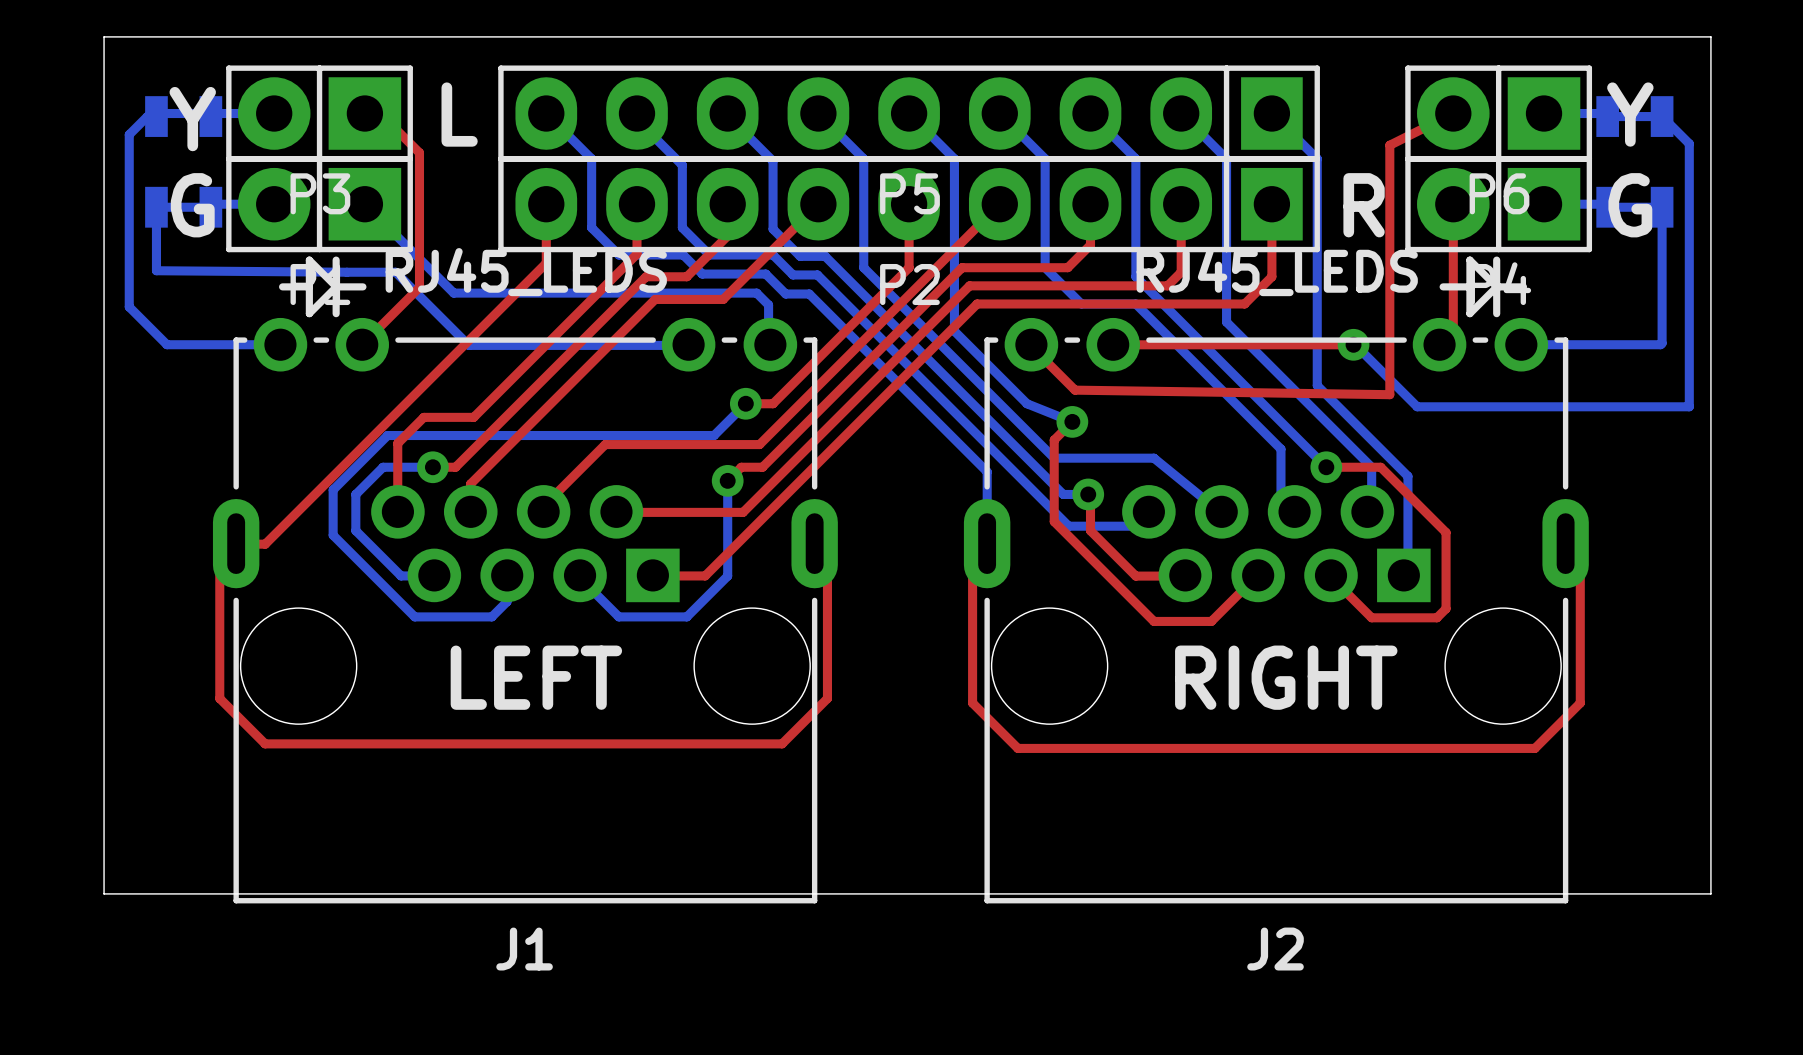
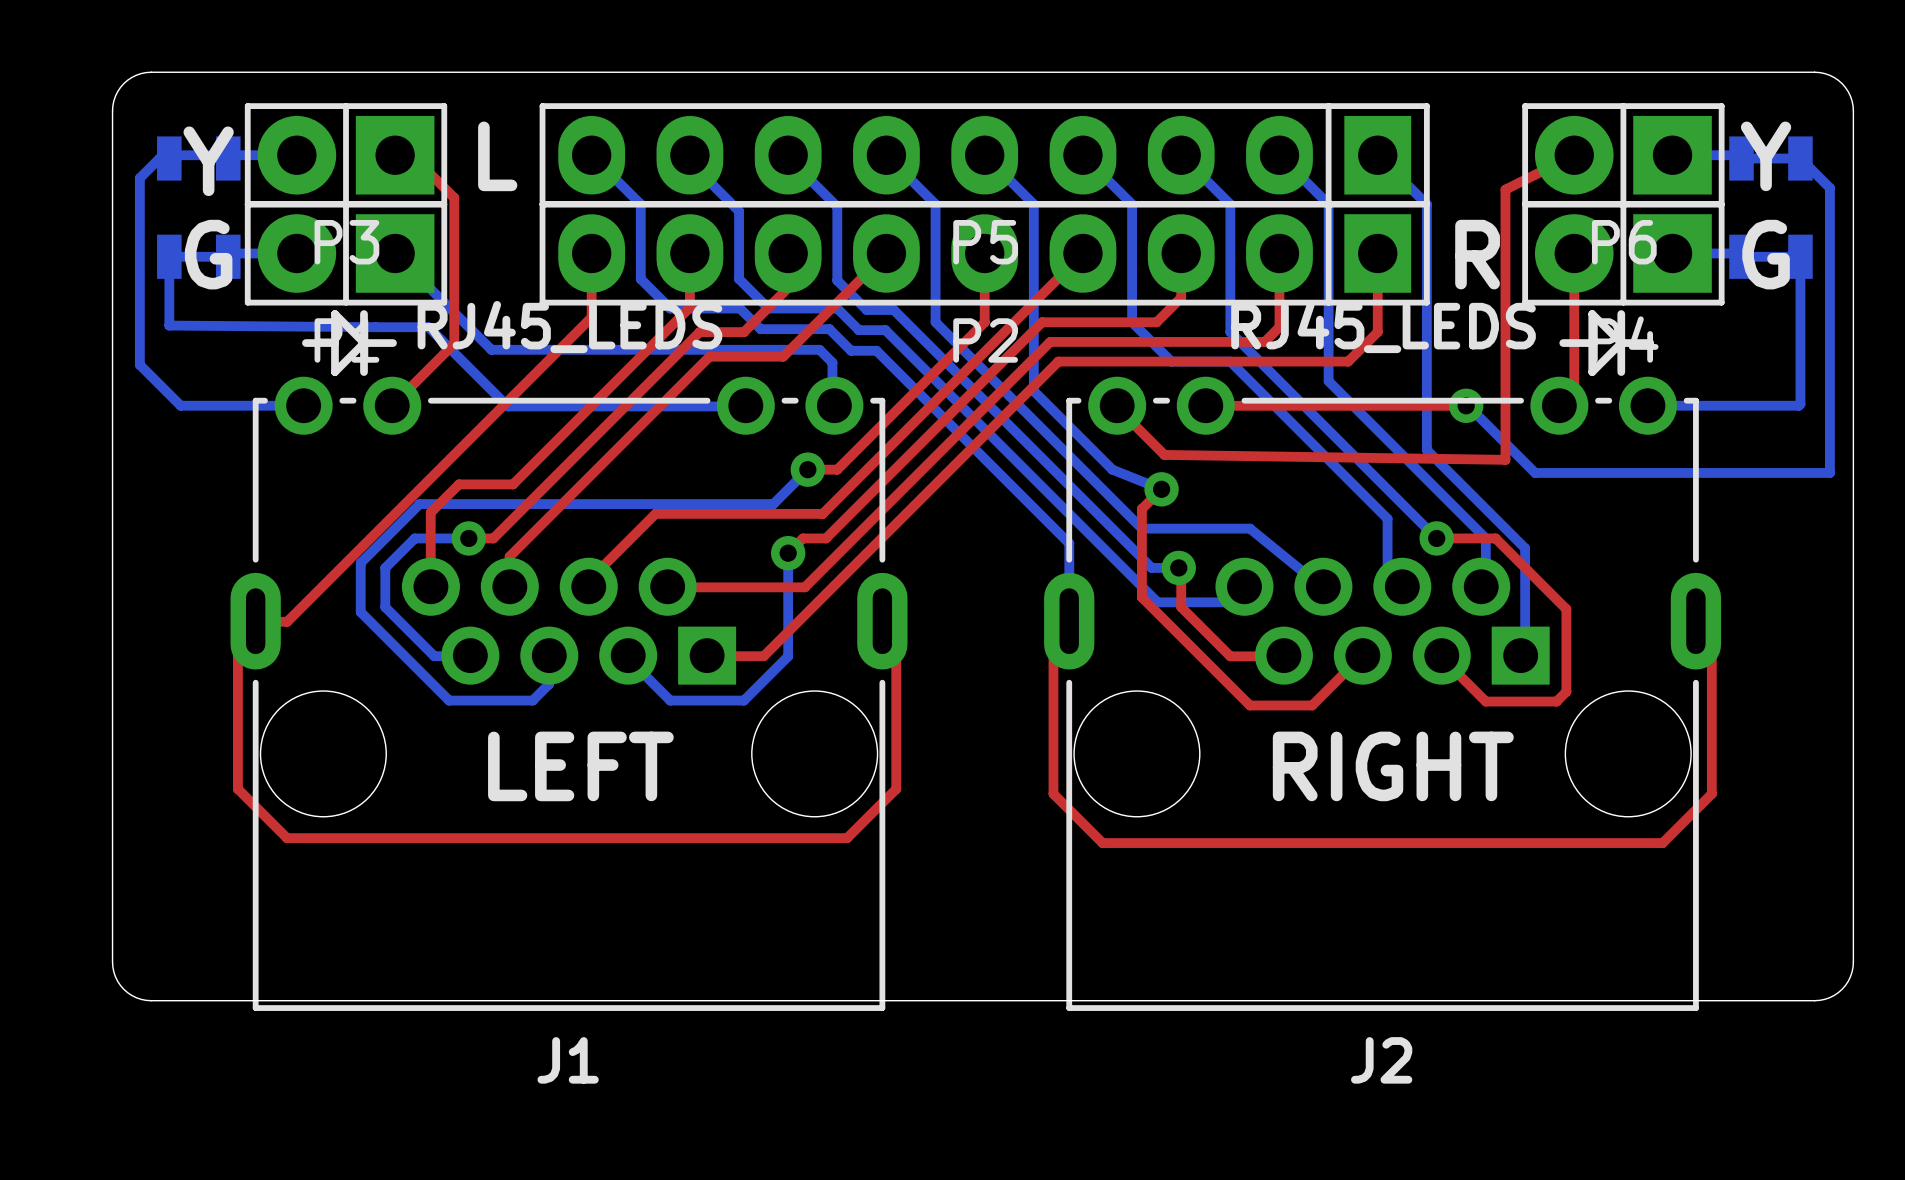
board edge: (139, 36) (104, 36) (104, 72) -> (151, 72) (136, 75) (123, 83) (115, 96) (112, 110)
board edge: (1675, 36) (1710, 36) (1710, 72) -> (1814, 72) (1829, 75) (1842, 83) (1850, 96) (1853, 110)
board edge: (104, 858) (104, 893) (139, 893) -> (112, 962) (115, 976) (123, 989) (136, 997) (151, 1000)
board edge: (1710, 858) (1710, 893) (1675, 893) -> (1853, 962) (1850, 976) (1842, 989) (1829, 997) (1814, 1000)

